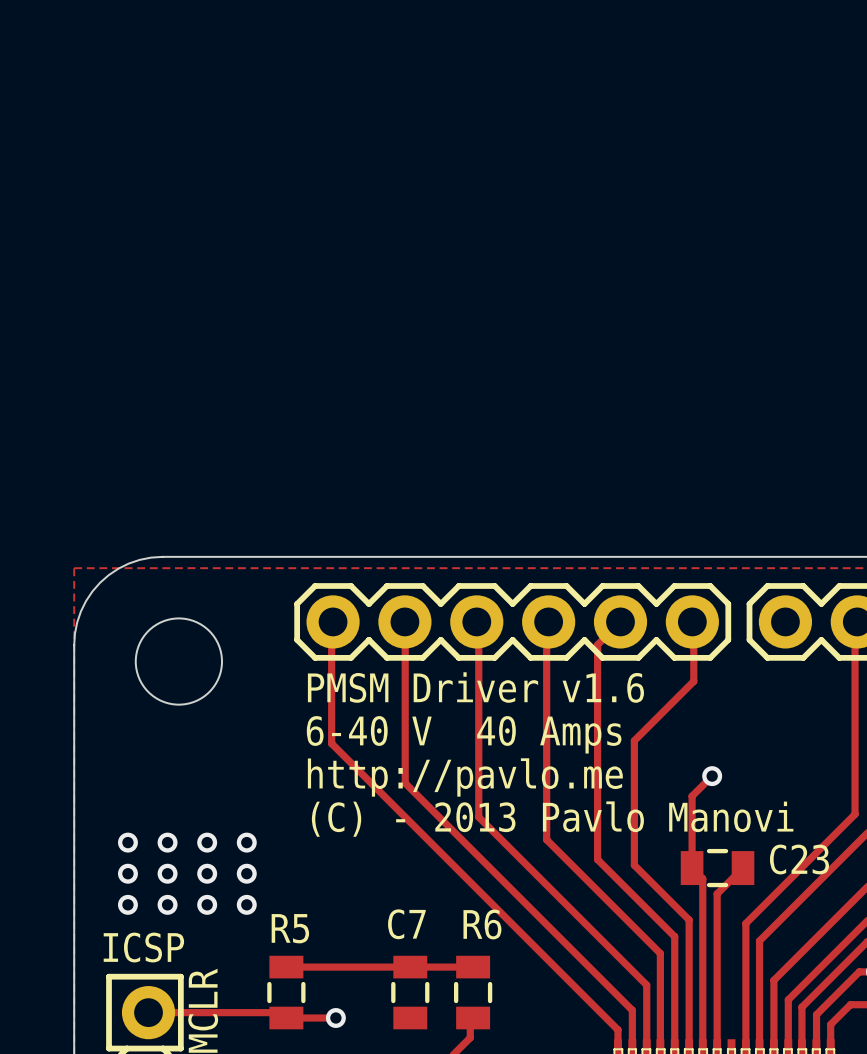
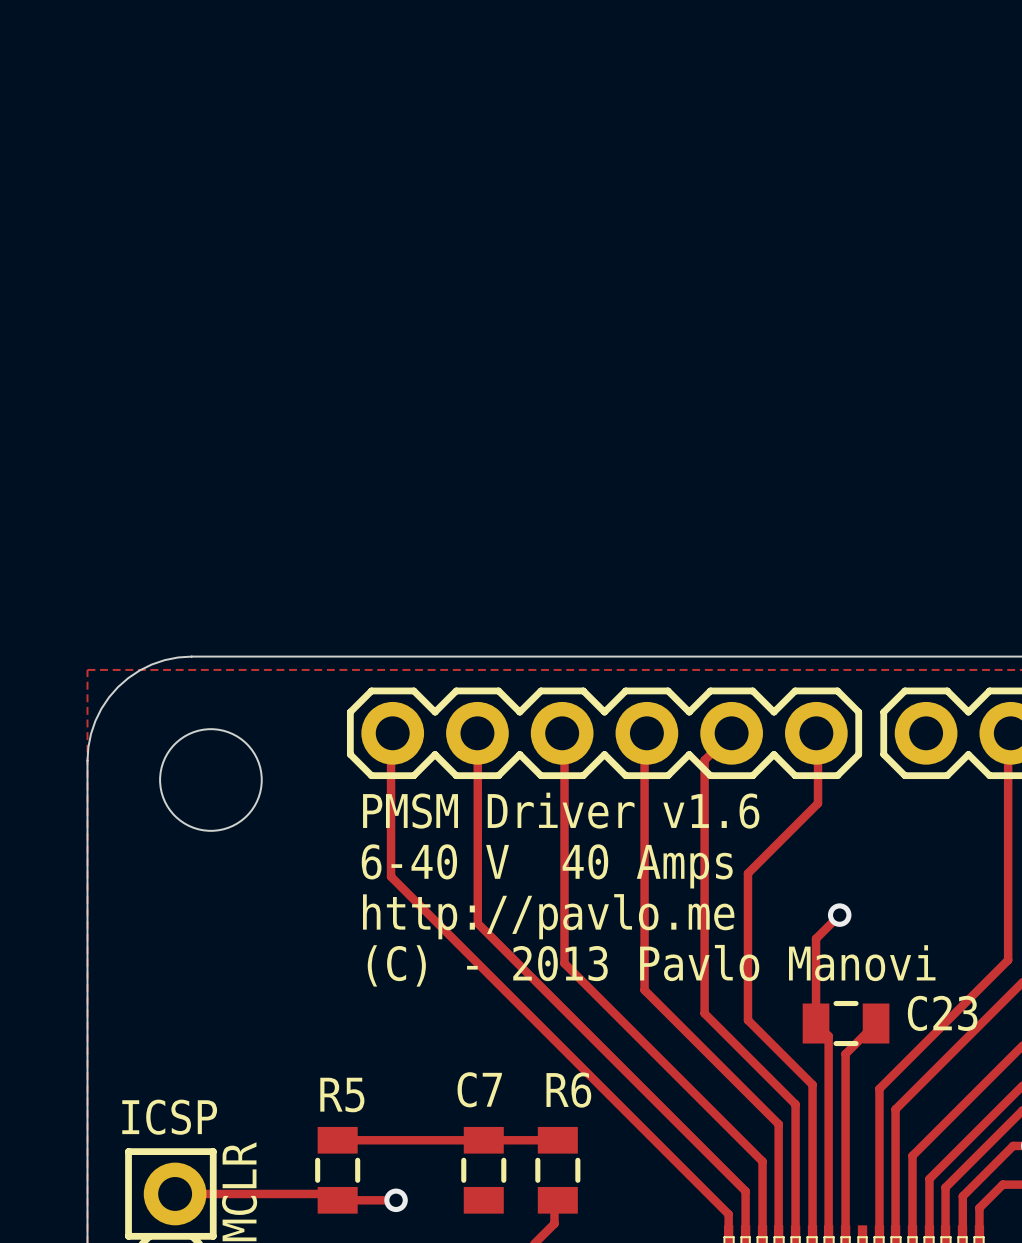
via: (127, 842) -> none
via: (167, 842) -> none
via: (207, 842) -> none
via: (246, 842) -> none
via: (127, 873) -> none
via: (167, 873) -> none
via: (207, 873) -> none
via: (246, 873) -> none
via: (127, 904) -> none
via: (167, 904) -> none
via: (207, 904) -> none
via: (246, 904) -> none

